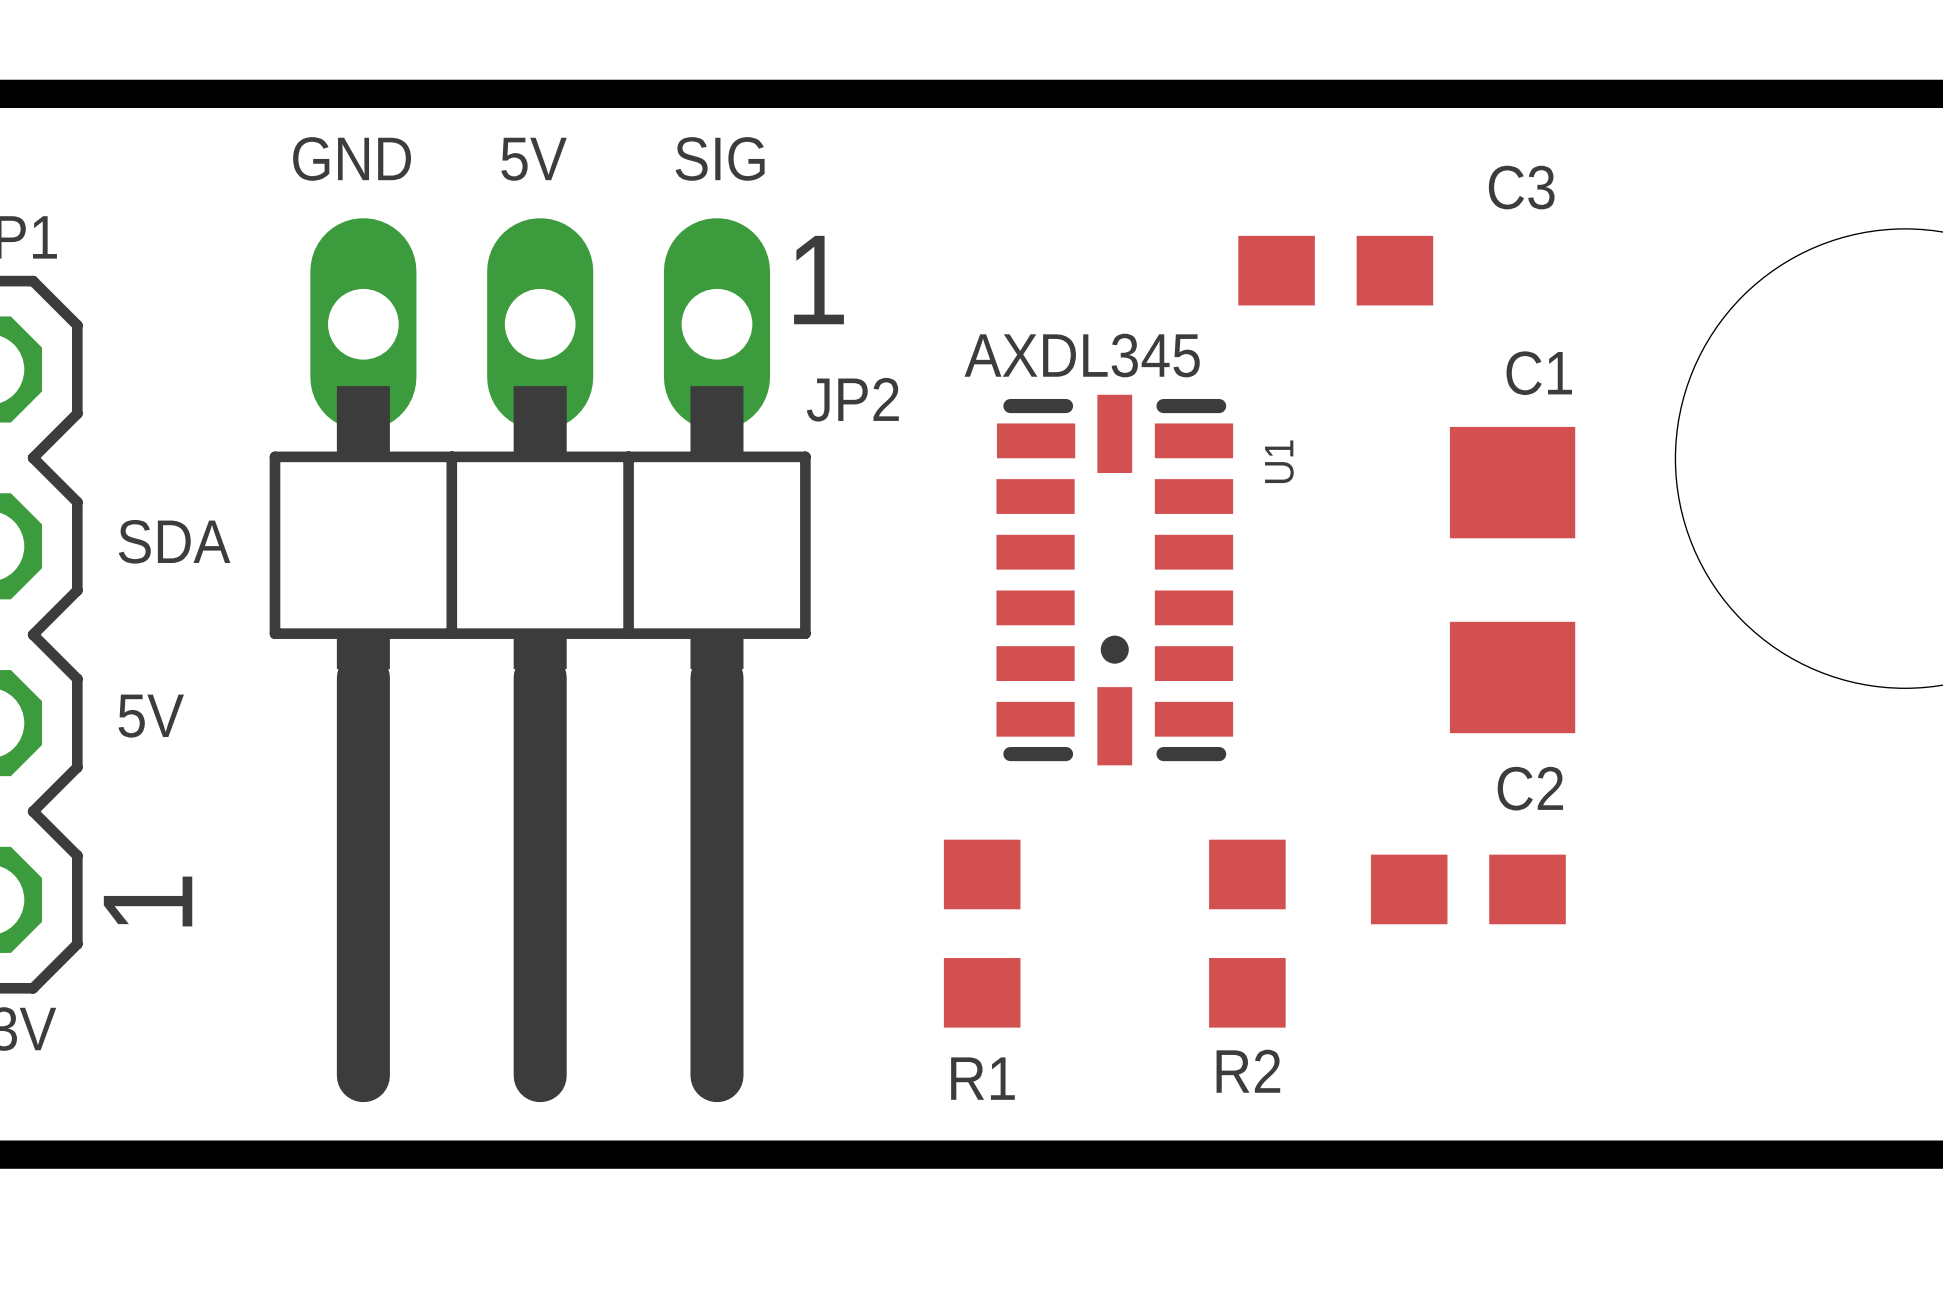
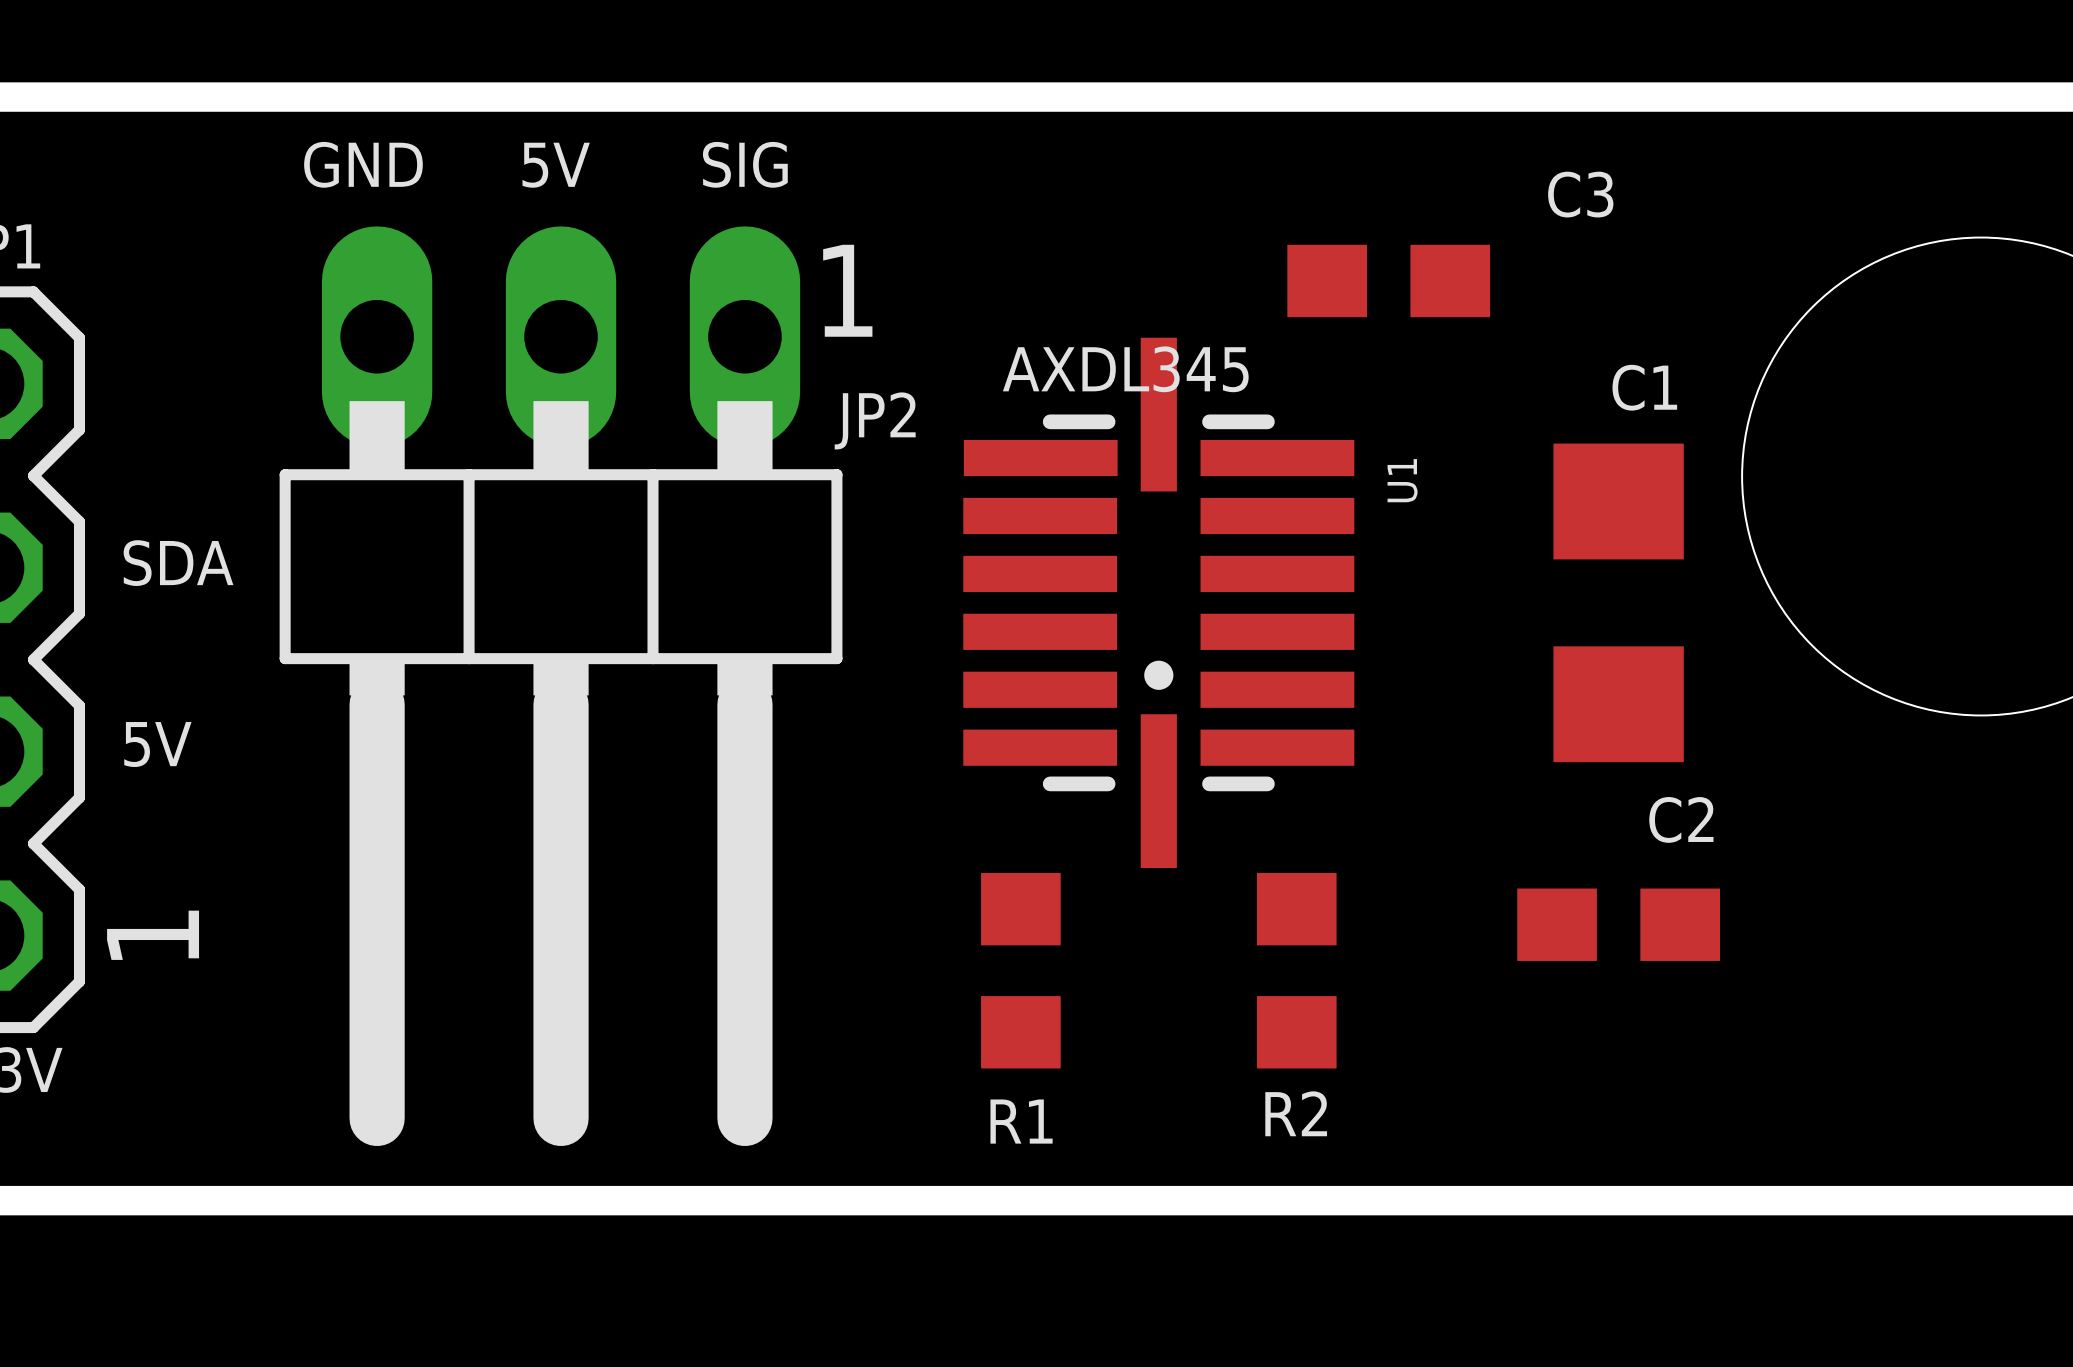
U1 footprint: [996, 394, 1234, 766] -> [963, 337, 1355, 869]
U1 name position: U1 (1279, 461) -> U1 (1402, 480)
C1 position: (1512, 580) -> (1618, 602)
C2 position: (1468, 889) -> (1618, 924)

